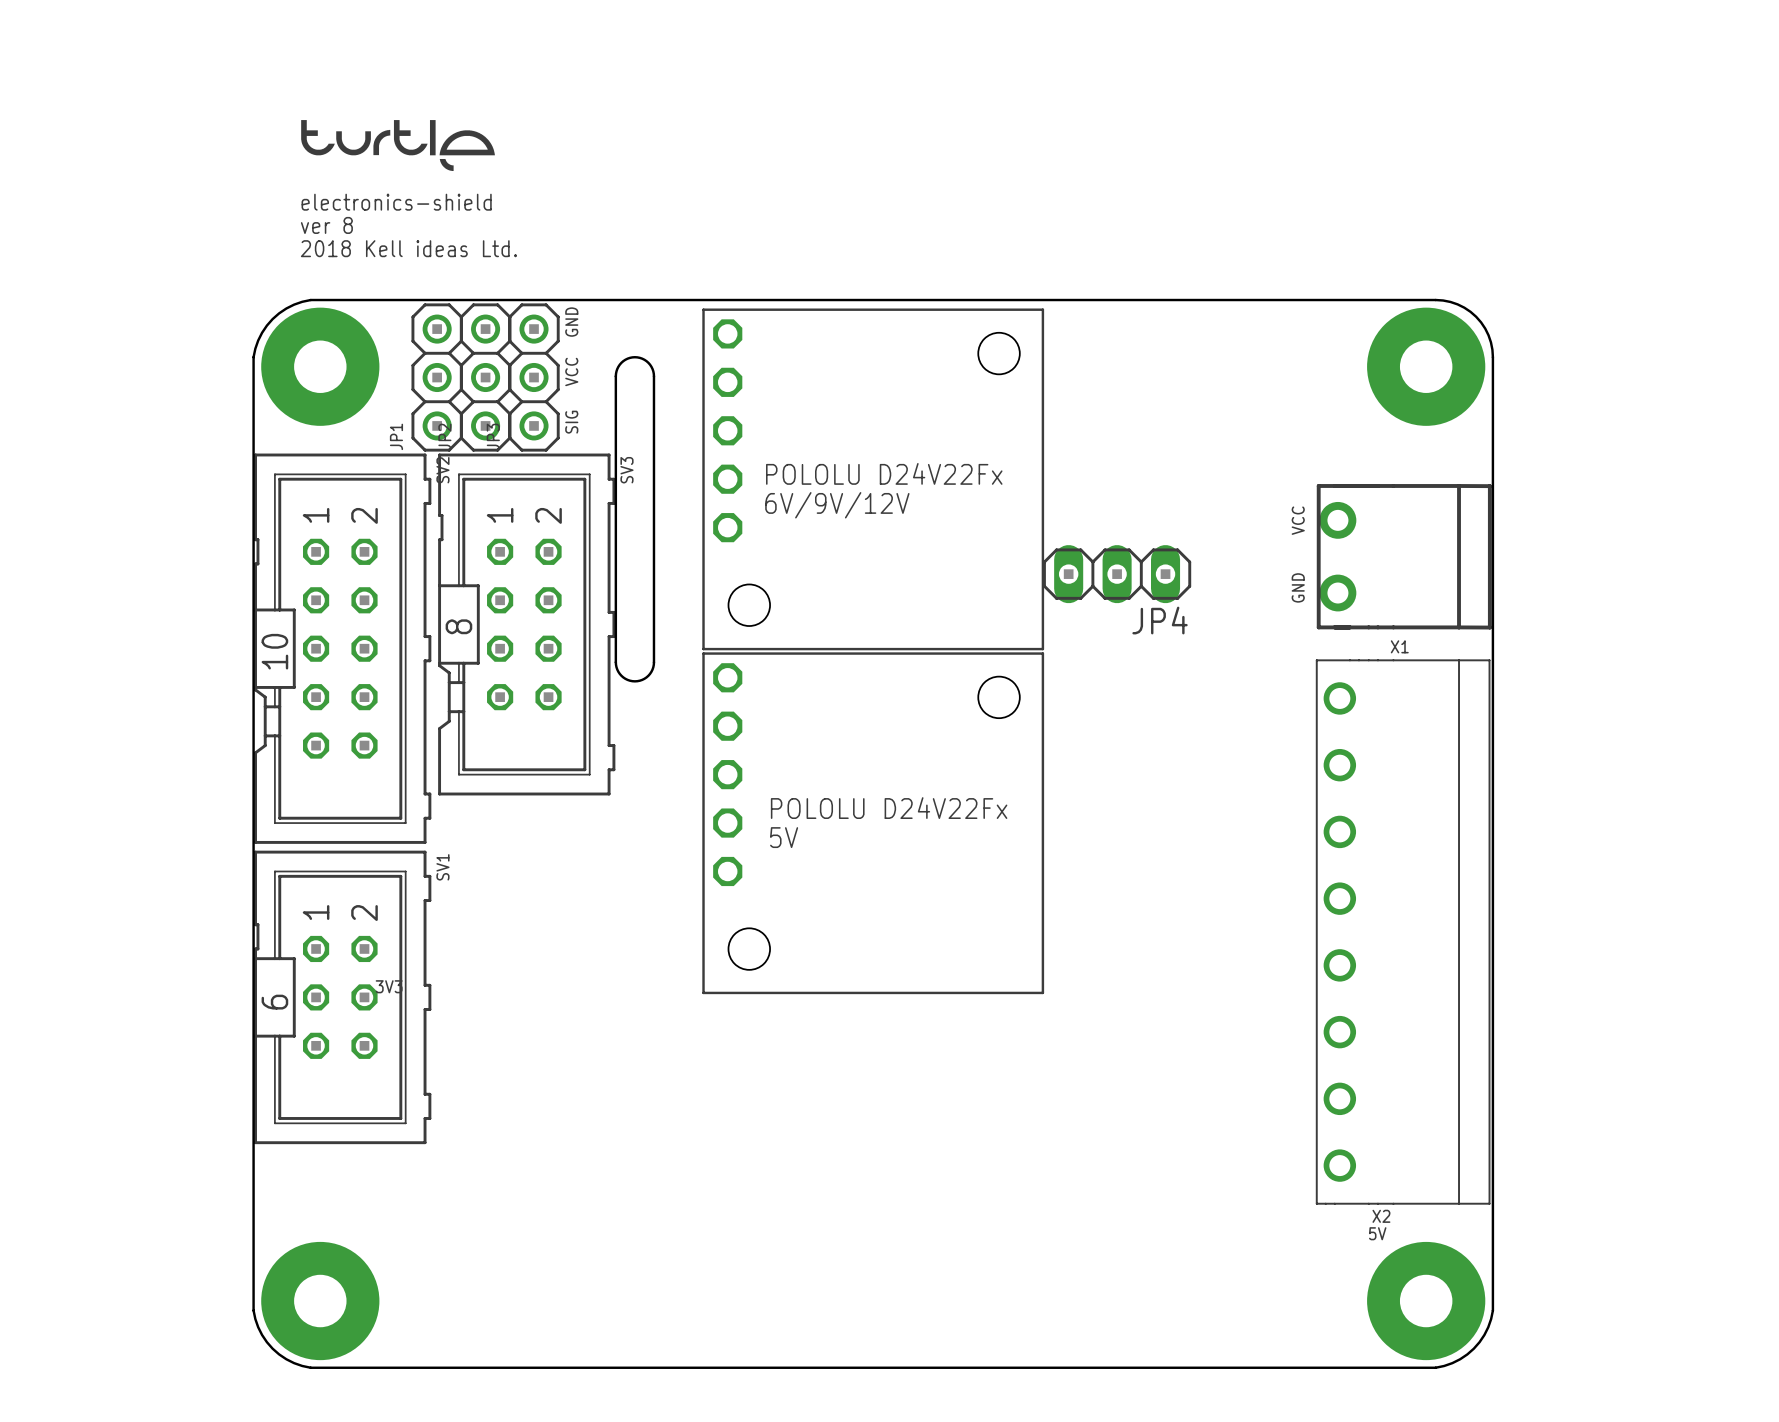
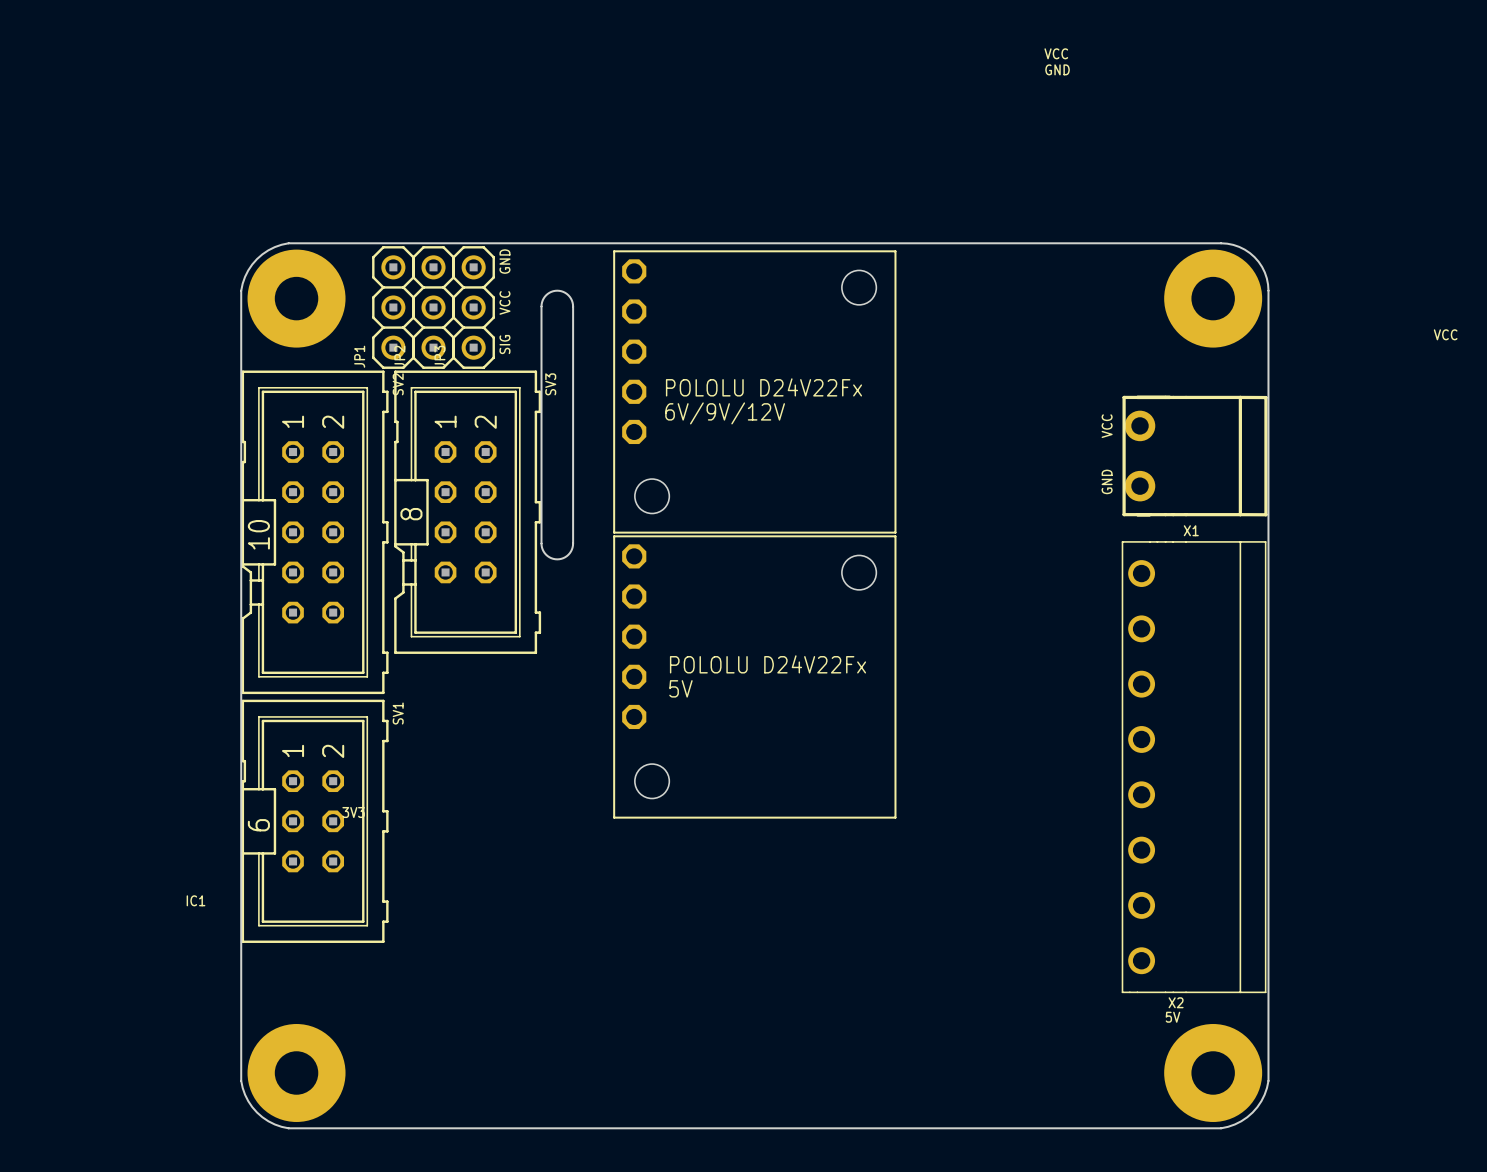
text: none -> VCC (1056, 53)
text: none -> GND (1057, 69)
drawing: [301, 120, 495, 172] -> none
text: electronics-shield (396, 202) -> none
text: ver 8 (326, 225) -> none
text: 2018 Kell ideas Ltd. (408, 248) -> none
text: none -> VCC (1445, 334)
JP4: (1117, 574) -> none
text: none -> IC1 (196, 900)

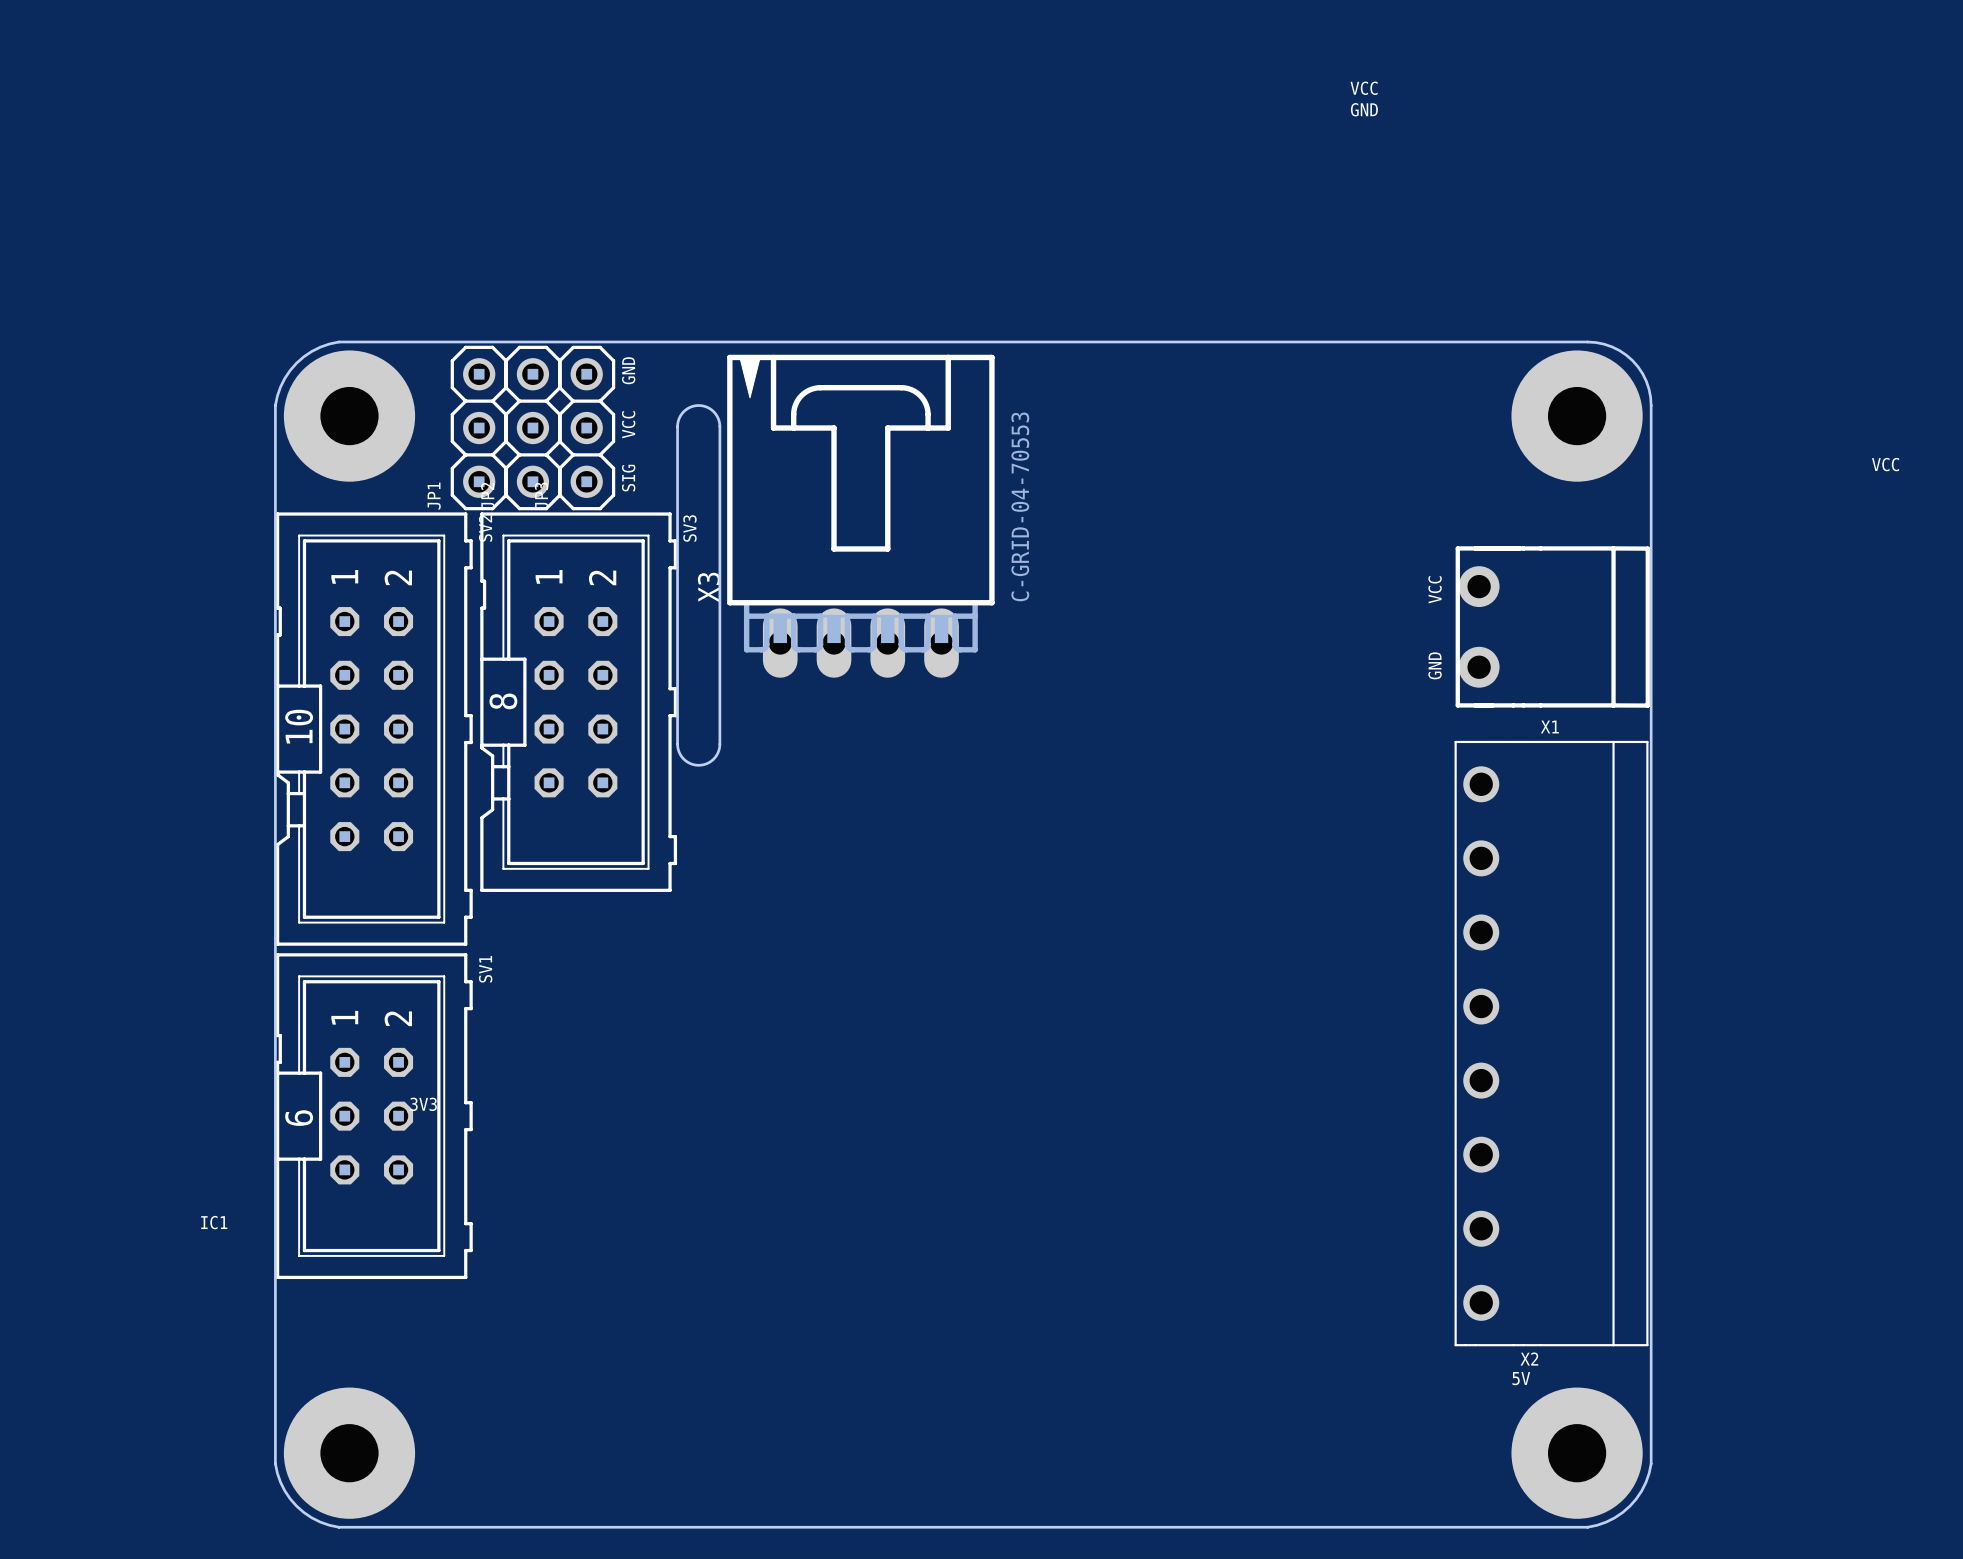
X3: none -> C-GRID-04-70553 (860, 516)
text: POLOLU D24V22Fx (763, 387) -> none
part: (754, 391) -> none
text: 6V/9V/12V (725, 413) -> none
text: POLOLU D24V22Fx (768, 664) -> none
part: (754, 676) -> none
text: 5V (680, 688) -> none

